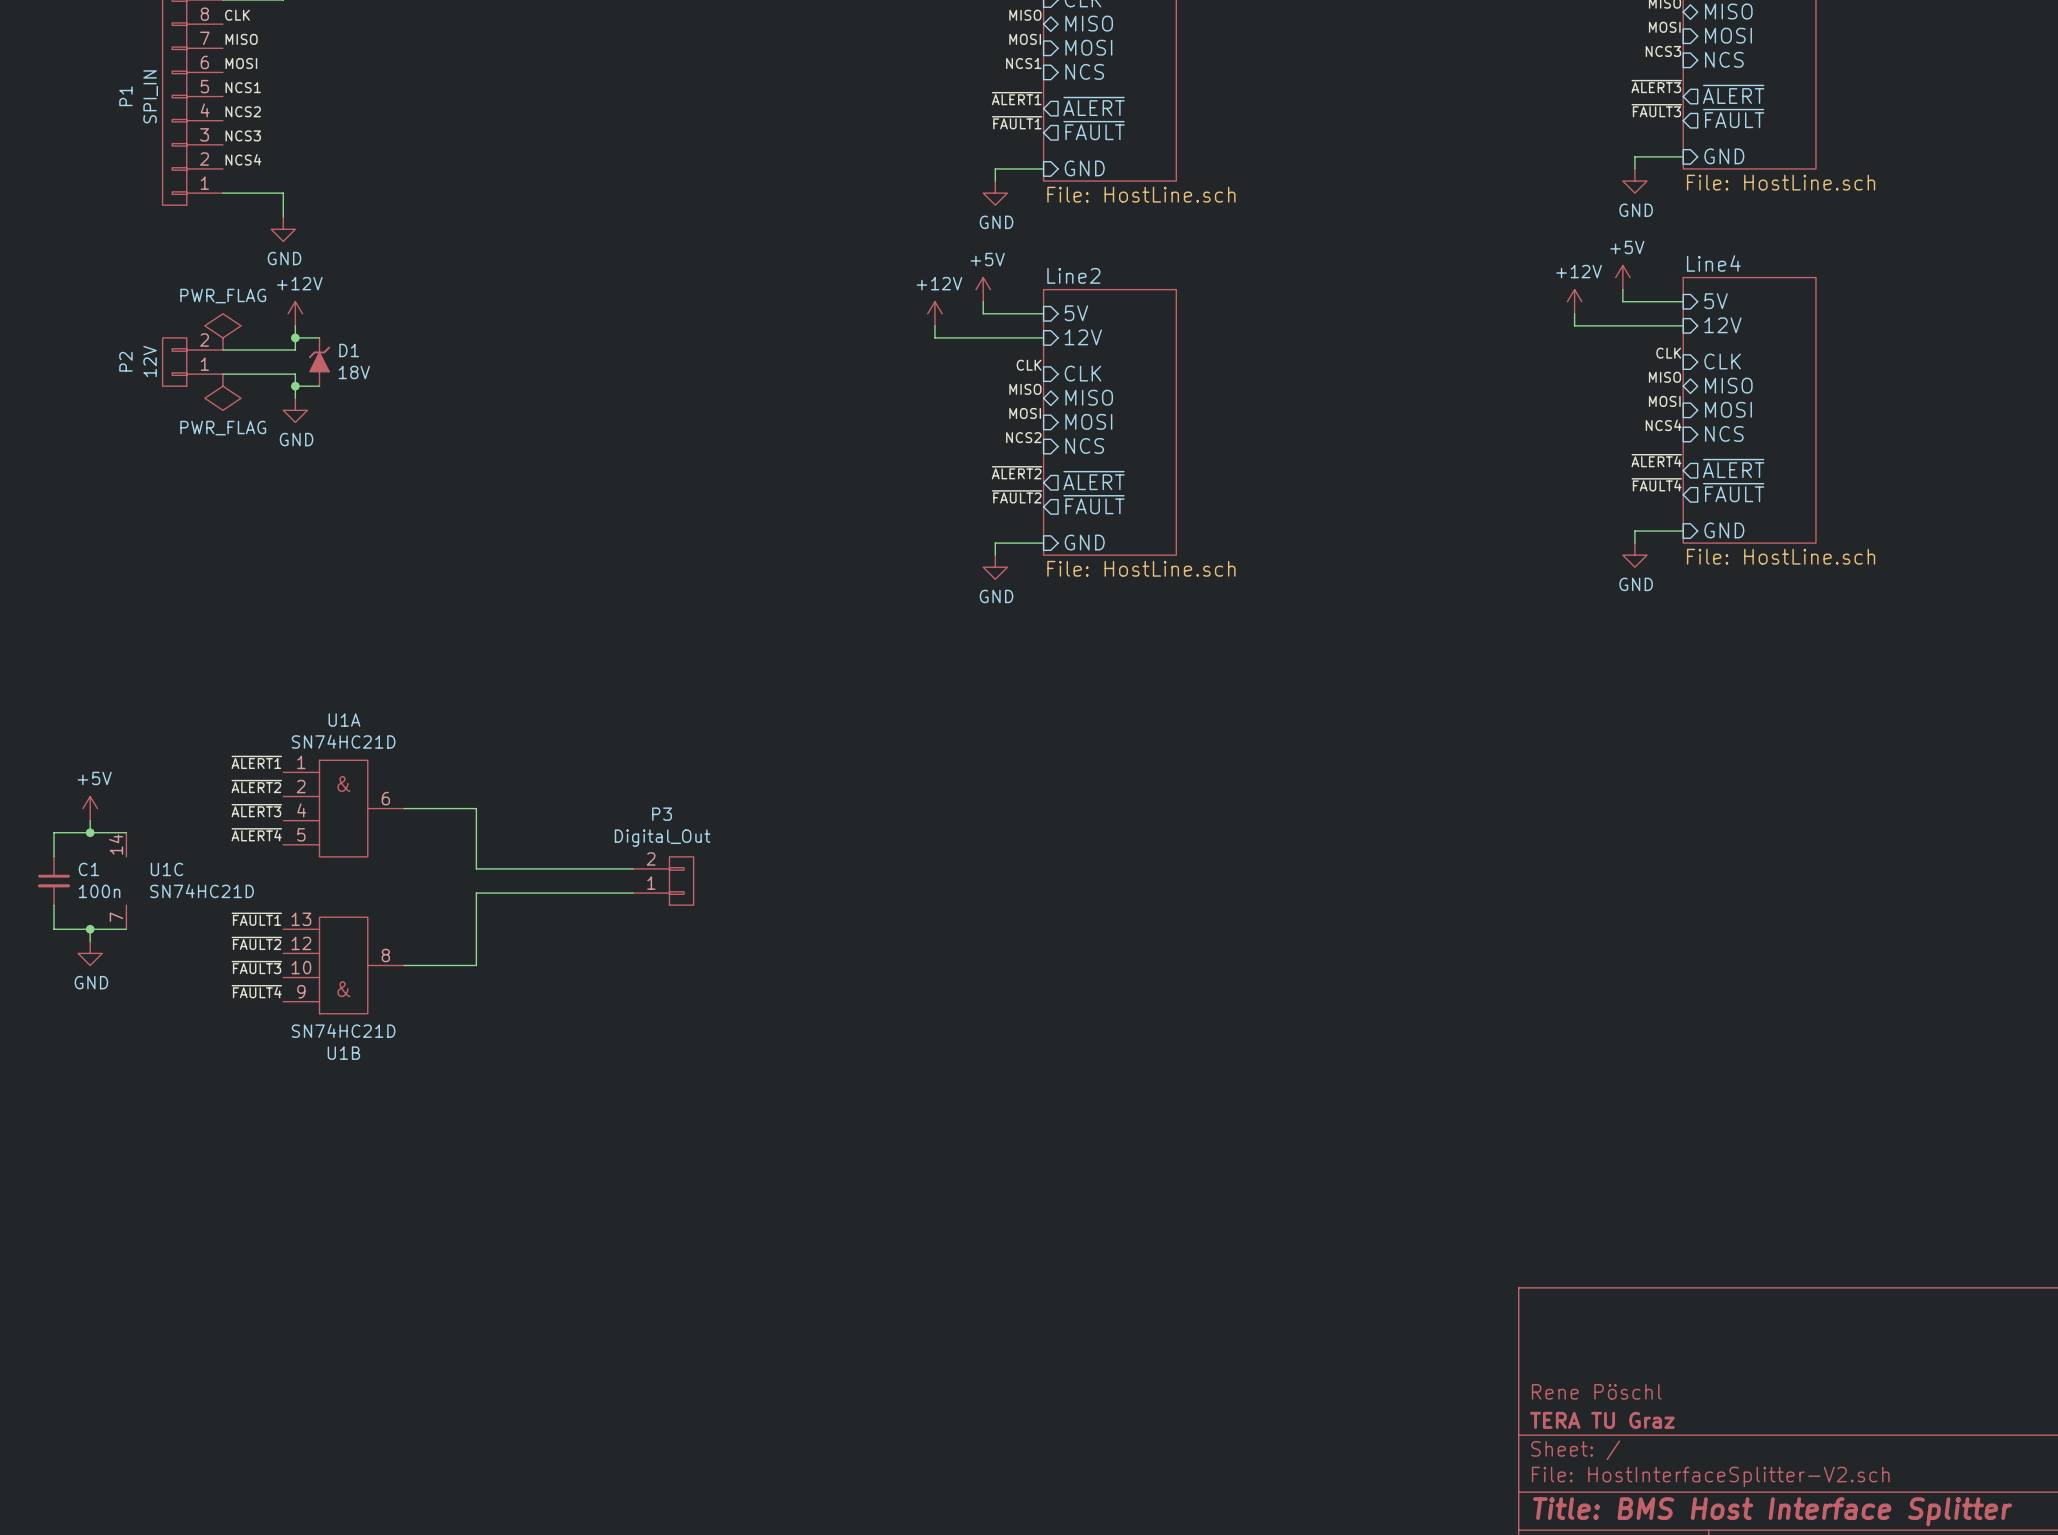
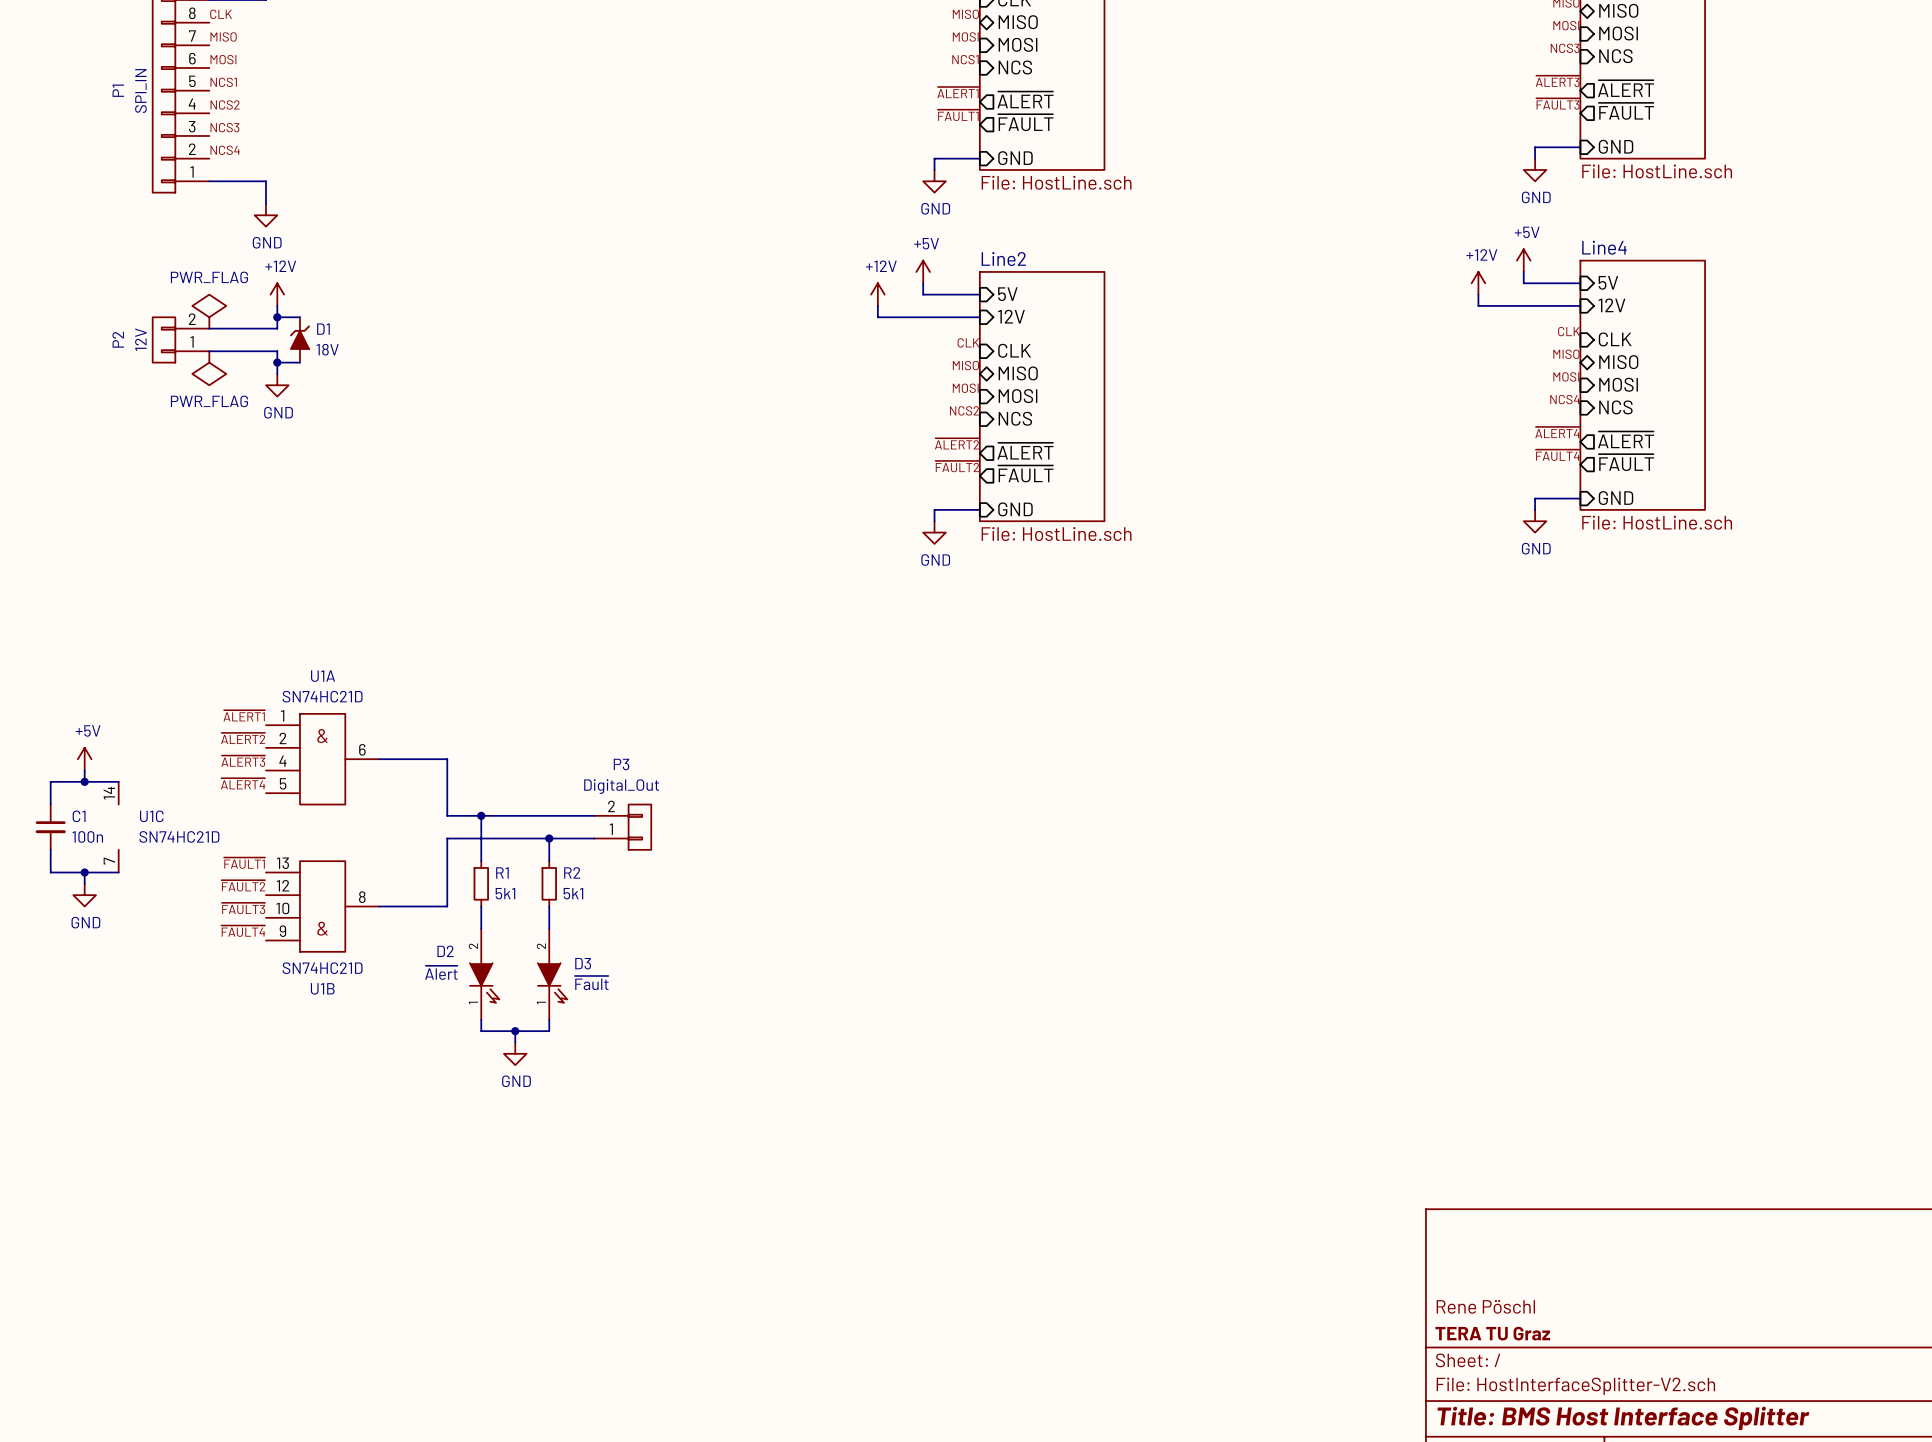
wire: none -> (481, 815) (481, 861)
junction: none -> (481, 815)
wire: none -> (549, 838) (549, 861)
junction: none -> (549, 838)
R1: none -> 5k1 (481, 883)
R2: none -> 5k1 (549, 883)
wire: none -> (481, 906) (481, 929)
wire: none -> (549, 906) (549, 929)
D2: none -> ~{Alert} (484, 974)
D3: none -> ~{Fault} (552, 974)
wire: none -> (481, 1019) (481, 1031) (549, 1031) (549, 1019)
wire: none -> (515, 1031) (515, 1042)
junction: none -> (515, 1031)
power symbol: none -> GND (515, 1053)

